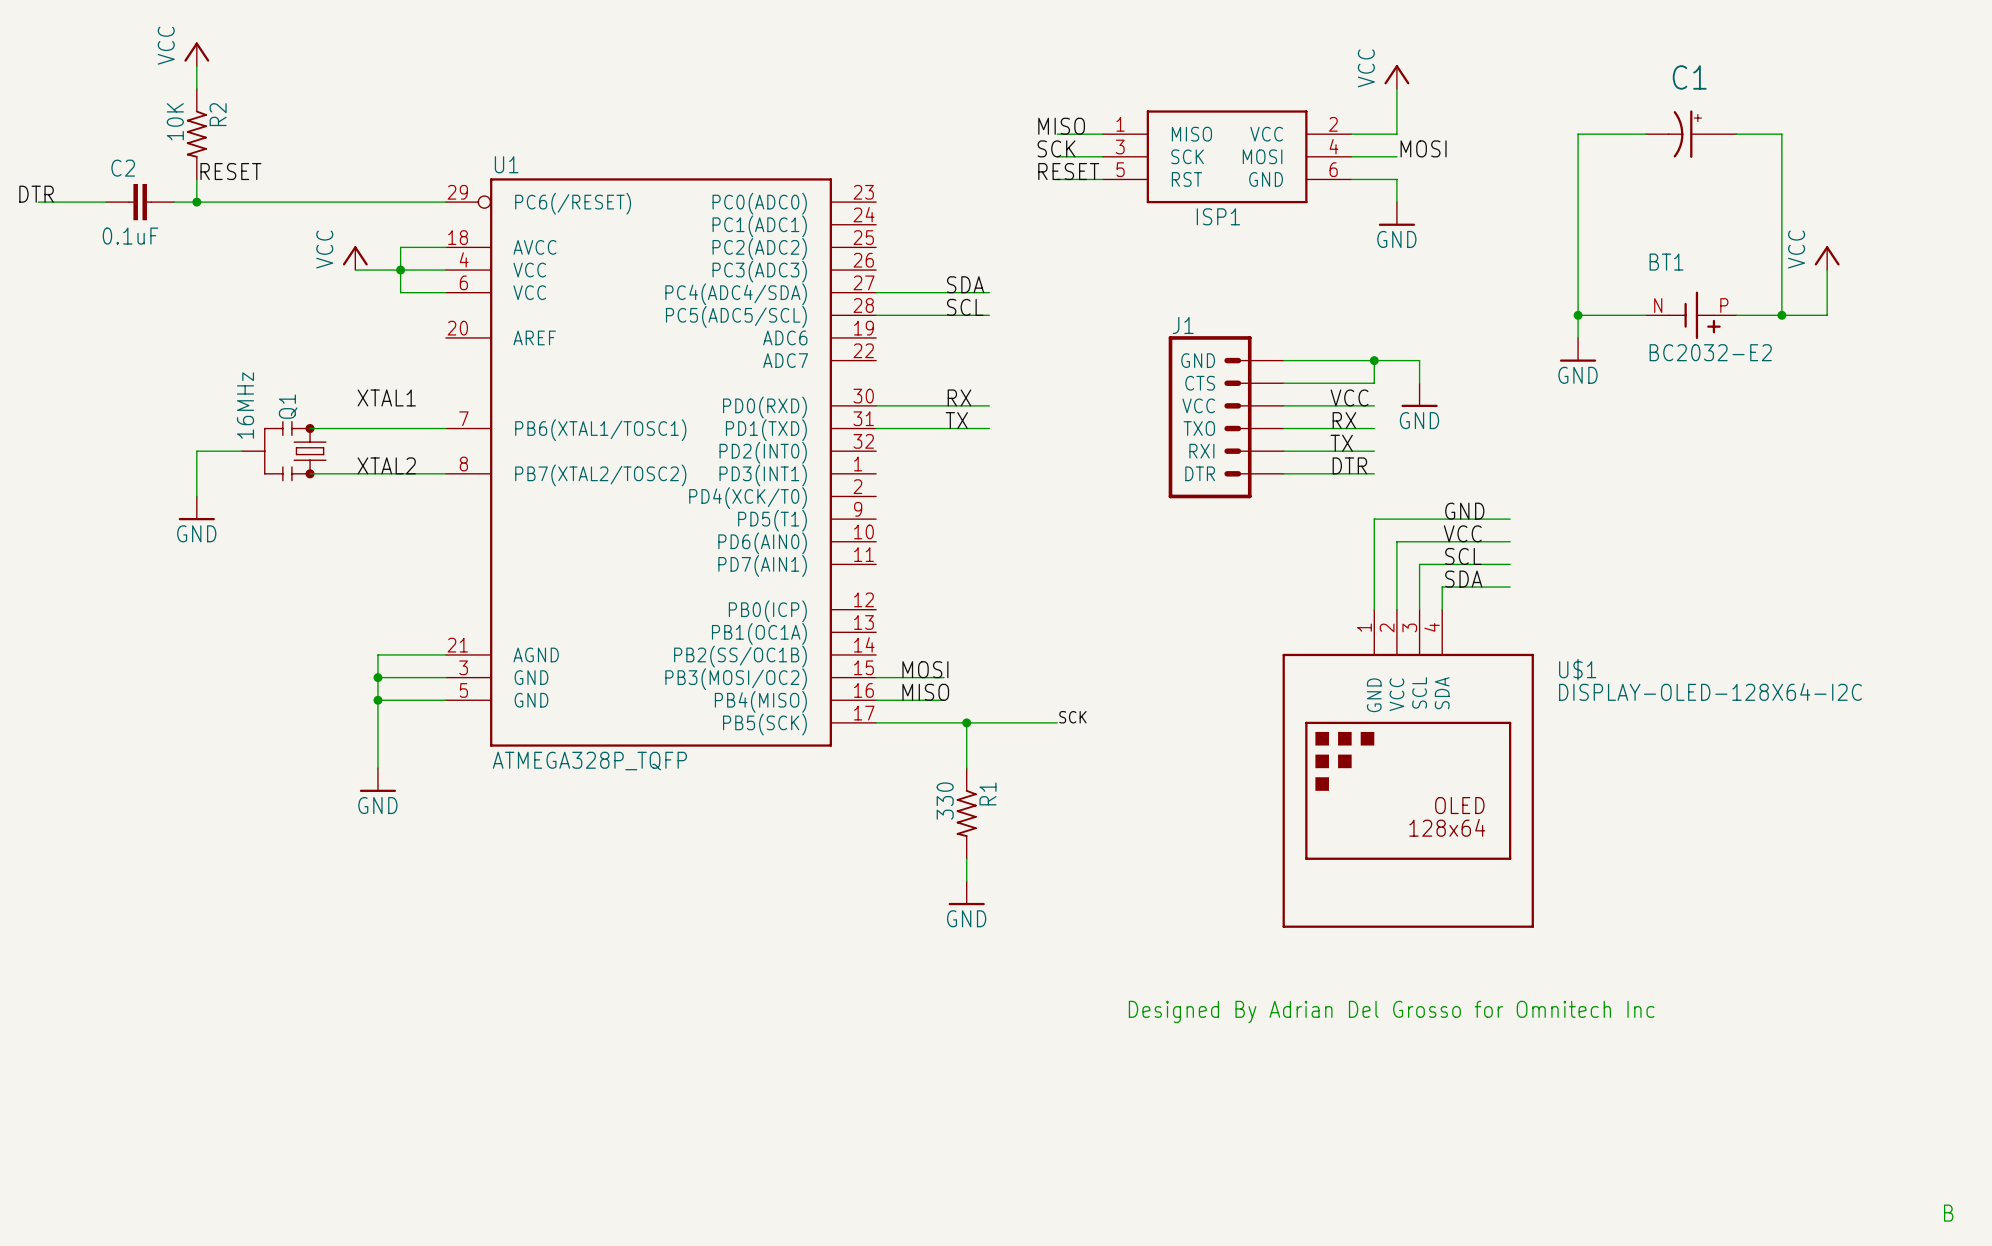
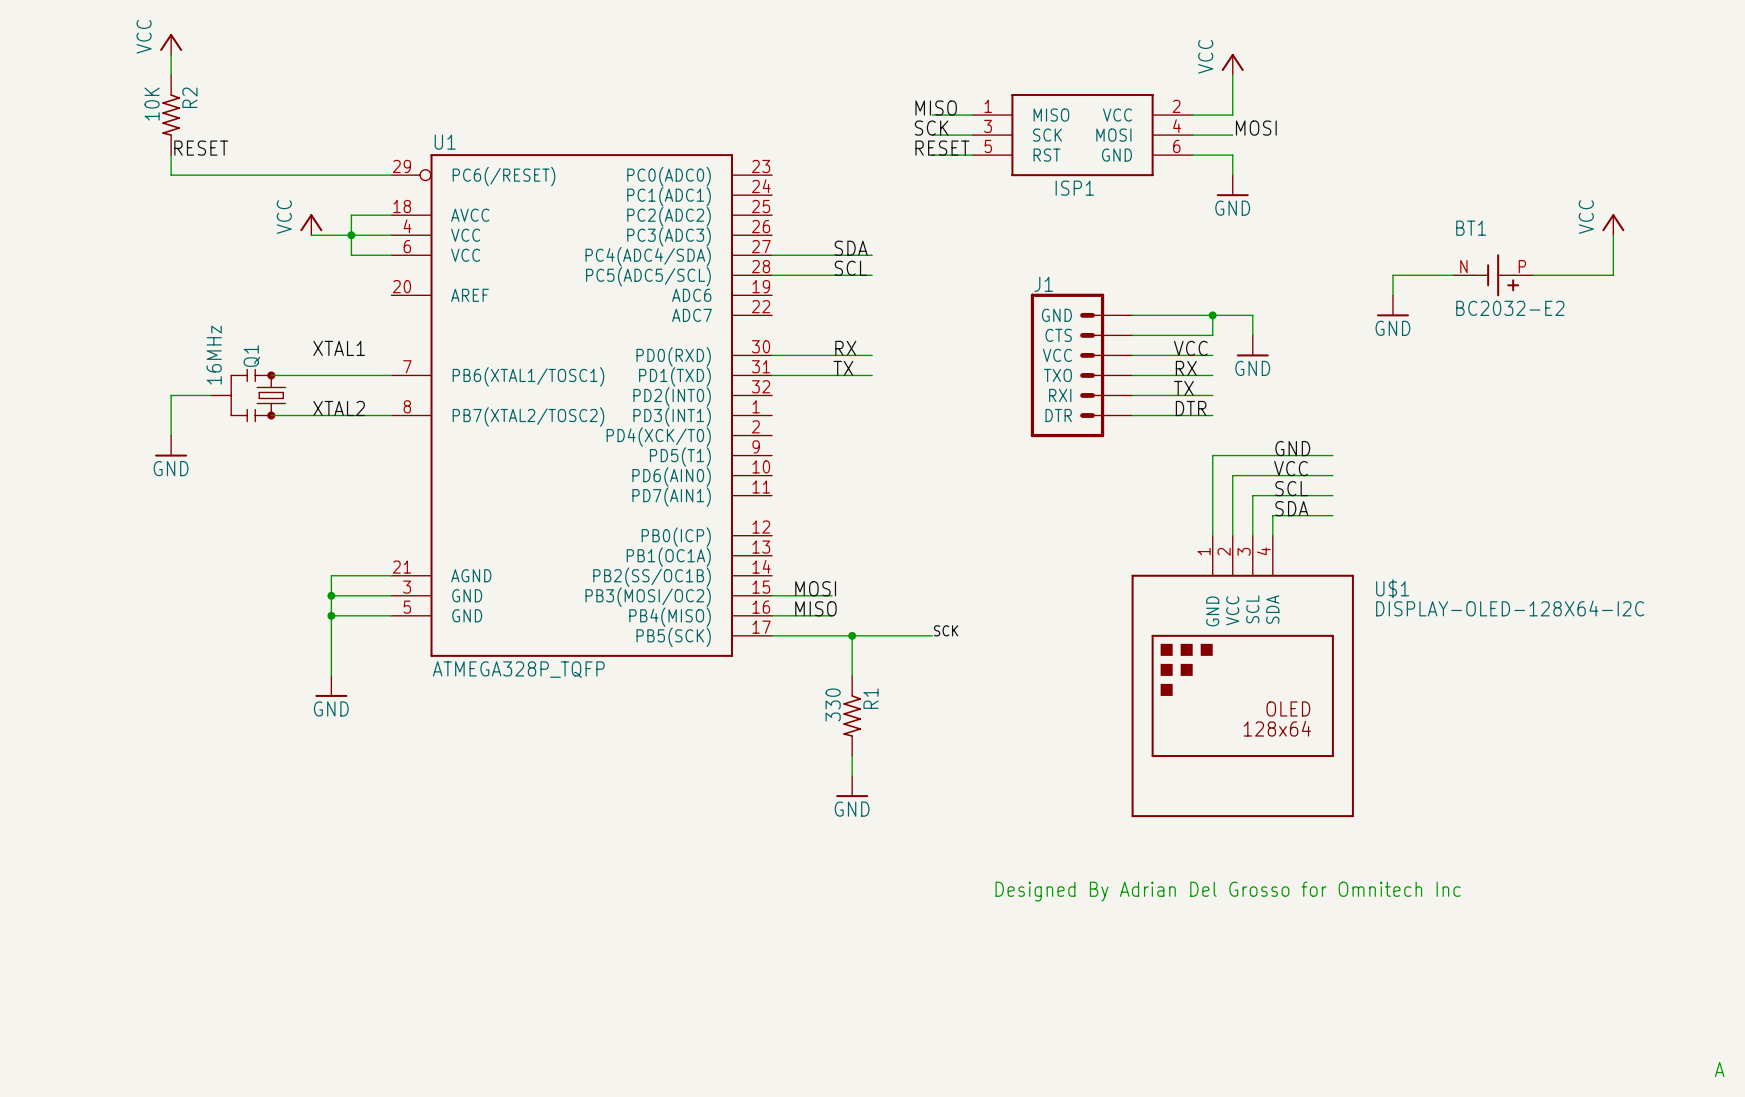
wire: (1646, 134) (1578, 134) (1578, 315) -> none
C1: (1691, 134) -> none
wire: (1736, 134) (1781, 134) (1781, 315) -> none
label: DTR (36, 194) -> none
wire: (38, 202) (106, 202) -> none
C2: 0.1uF (140, 202) -> none
wire: (174, 202) (196, 202) -> none
junction: (196, 202) -> none
junction: (1578, 315) -> none
junction: (1781, 315) -> none
text: B (1948, 1213) -> A (1719, 1069)

